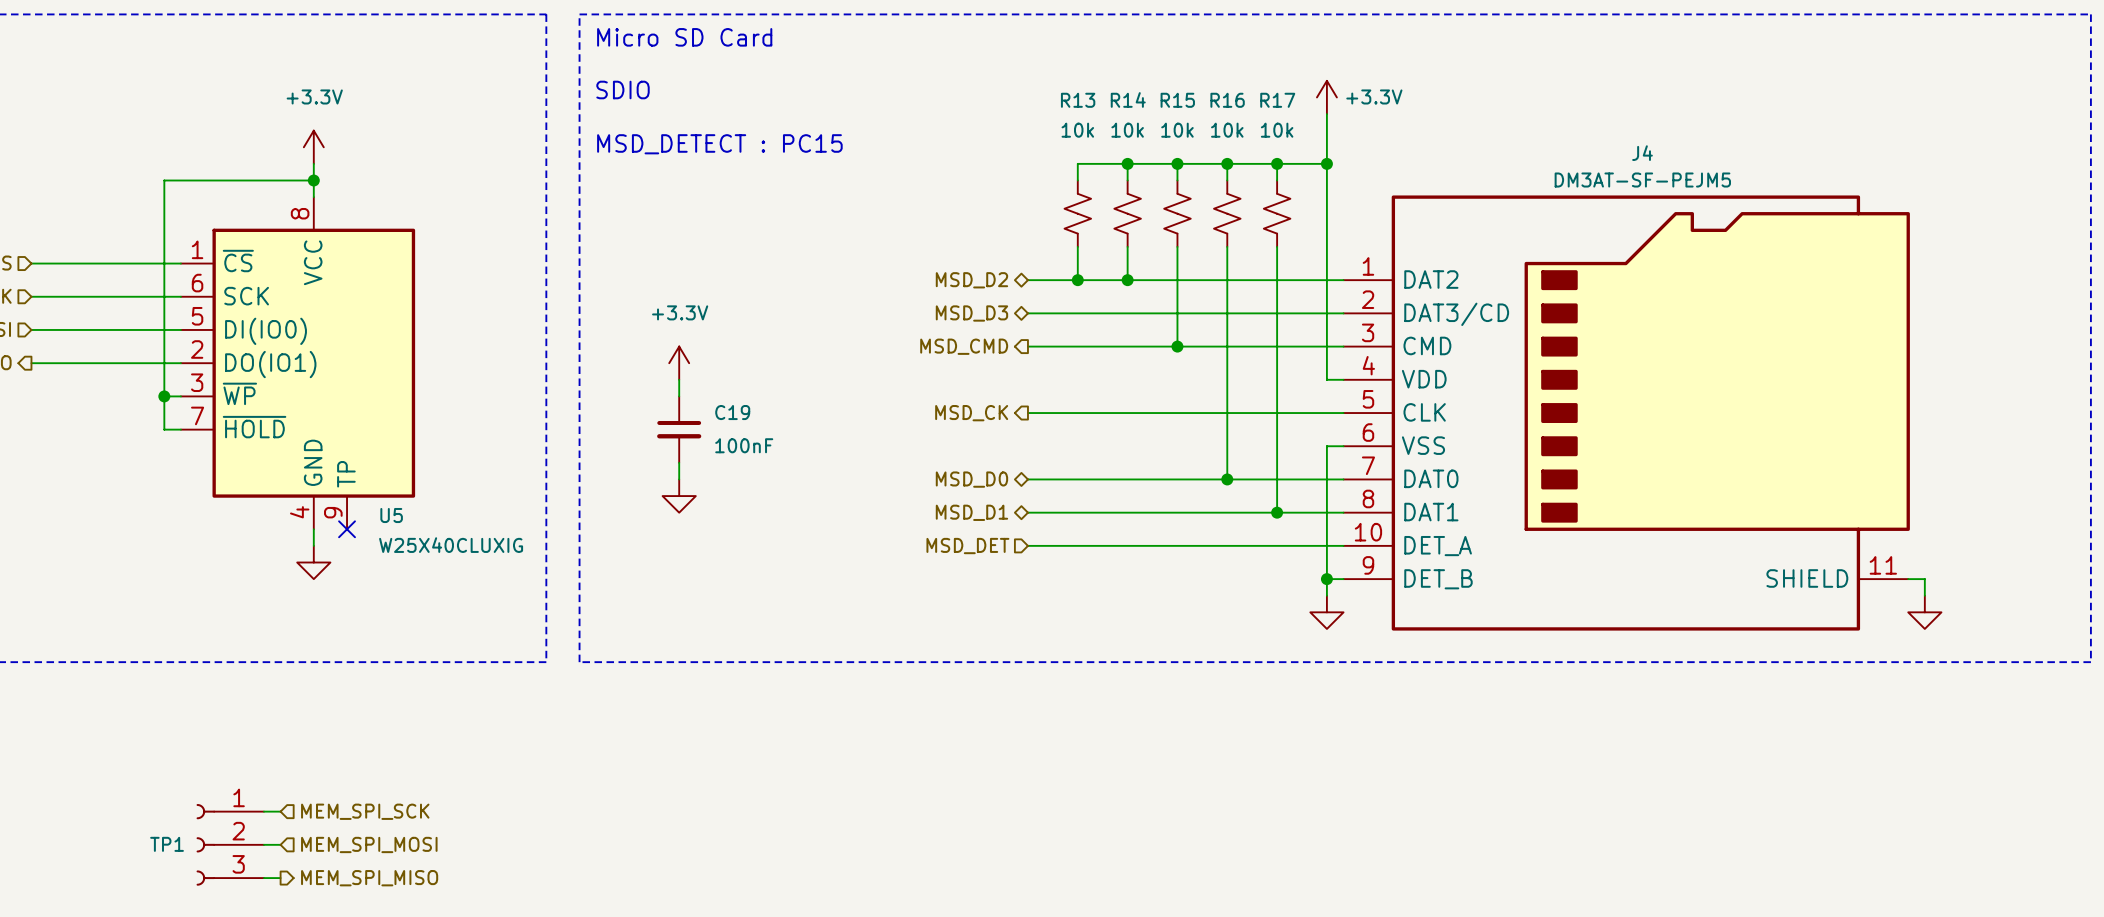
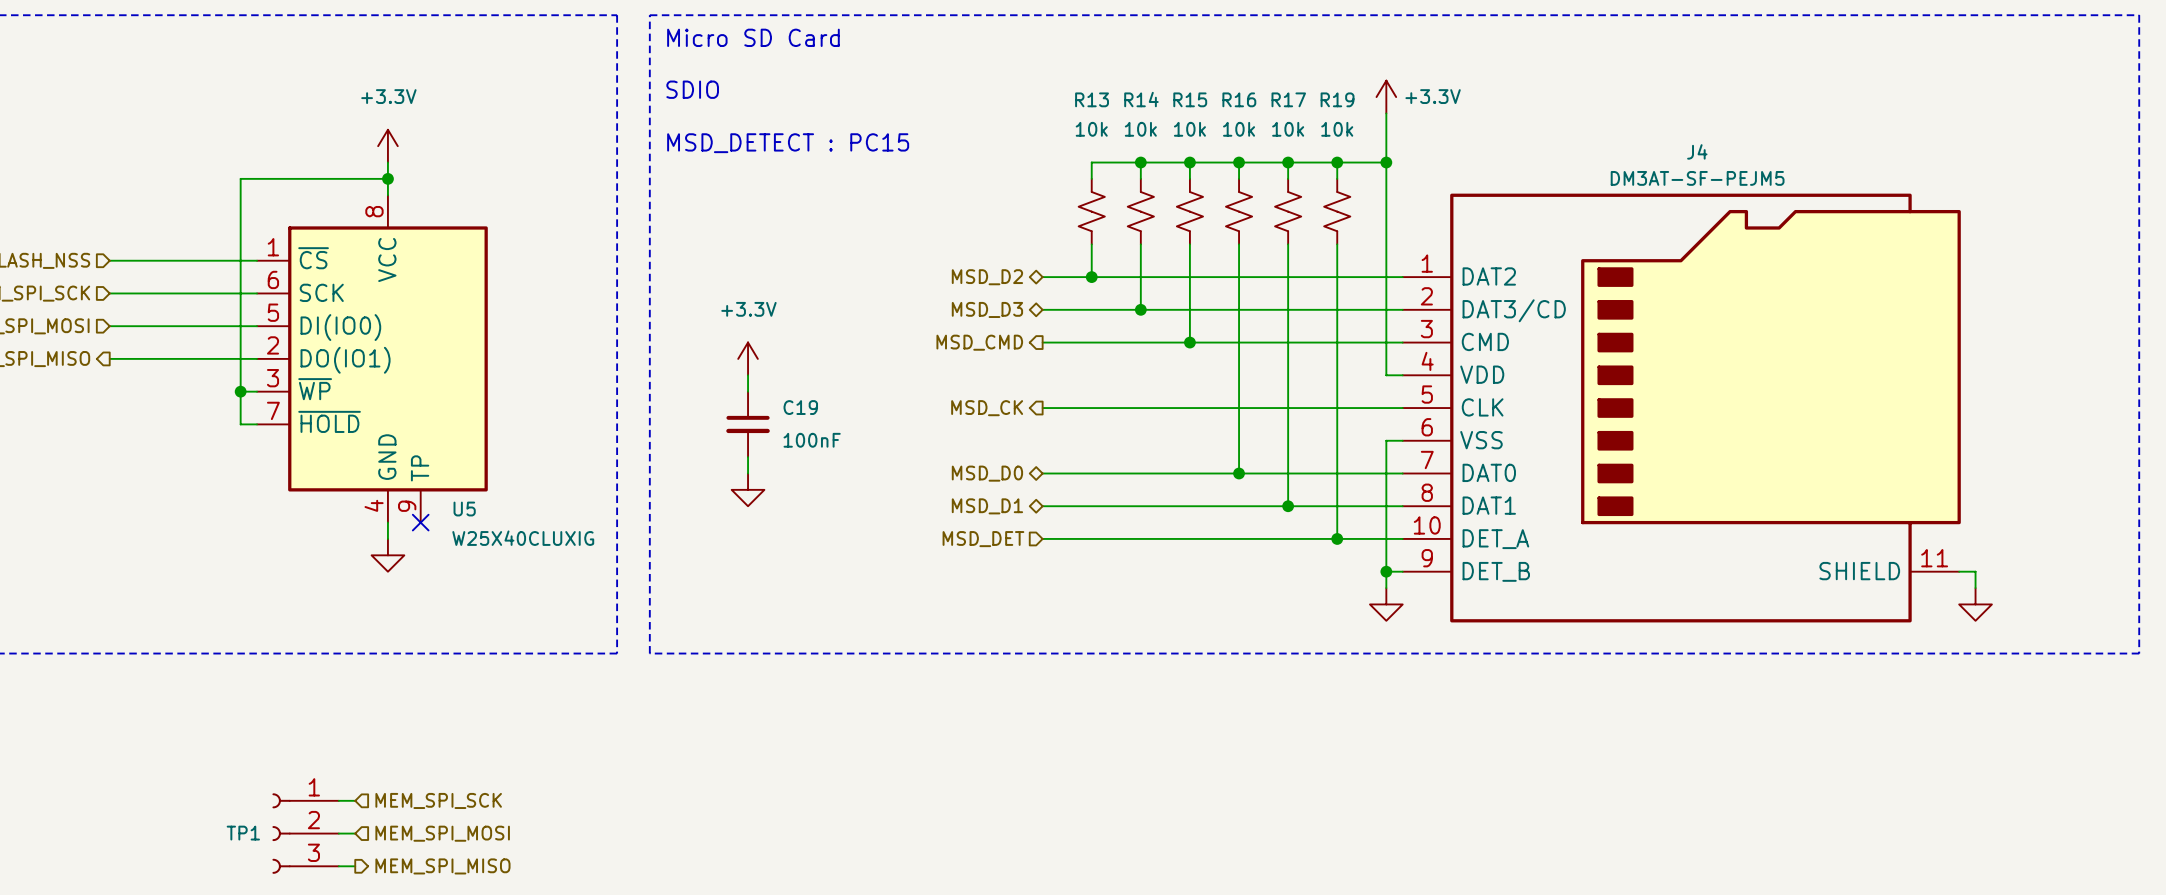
R14 name: R14 (1128, 99) -> R15 (1190, 99)
R13 name: R13 (1078, 100) -> R14 (1141, 99)
R15 name: R15 (1177, 100) -> R16 (1239, 99)
R16 name: R16 (1227, 100) -> R17 (1288, 99)
R17 name: R17 (1277, 100) -> R19 (1337, 99)
wire: none -> (1140, 162) (1091, 162) (1091, 178)
junction: none -> (1140, 162)
R13: none -> 10k (1091, 211)
wire: none -> (1091, 244) (1091, 277) (1042, 277)
hierarchical label position: MSD_D2 (971, 280) -> MSD_D2 (987, 277)
junction: none -> (1091, 277)
wire: none -> (1140, 277) (1140, 309)
junction: (1077, 280) -> none
wire: none -> (1189, 277) (1189, 342)
junction: (1127, 280) -> none
hierarchical label position: MSD_D3 (971, 313) -> MSD_D3 (987, 309)
wire: none -> (1042, 309) (1091, 309)
junction: none -> (1140, 309)
hierarchical label position: MSD_CMD (964, 346) -> MSD_CMD (979, 342)
wire: none -> (1042, 342) (1091, 342)
junction: none -> (1189, 342)
wire: none -> (1239, 342) (1239, 473)
junction: (1177, 346) -> none
hierarchical label position: MSD_CK (971, 413) -> MSD_CK (987, 408)
wire: none -> (1042, 408) (1091, 408)
hierarchical label position: MSD_D0 (971, 479) -> MSD_D0 (987, 473)
wire: none -> (1042, 473) (1091, 473)
junction: none -> (1239, 473)
wire: none -> (1288, 473) (1288, 506)
junction: (1227, 479) -> none
hierarchical label position: MSD_D1 (971, 512) -> MSD_D1 (987, 506)
wire: none -> (1042, 506) (1091, 506)
junction: none -> (1288, 506)
wire: none -> (1337, 506) (1337, 538)
junction: (1277, 512) -> none
wire: none -> (1042, 538) (1091, 538)
junction: none -> (1337, 538)
hierarchical label position: MSD_DET (967, 546) -> MSD_DET (983, 539)

